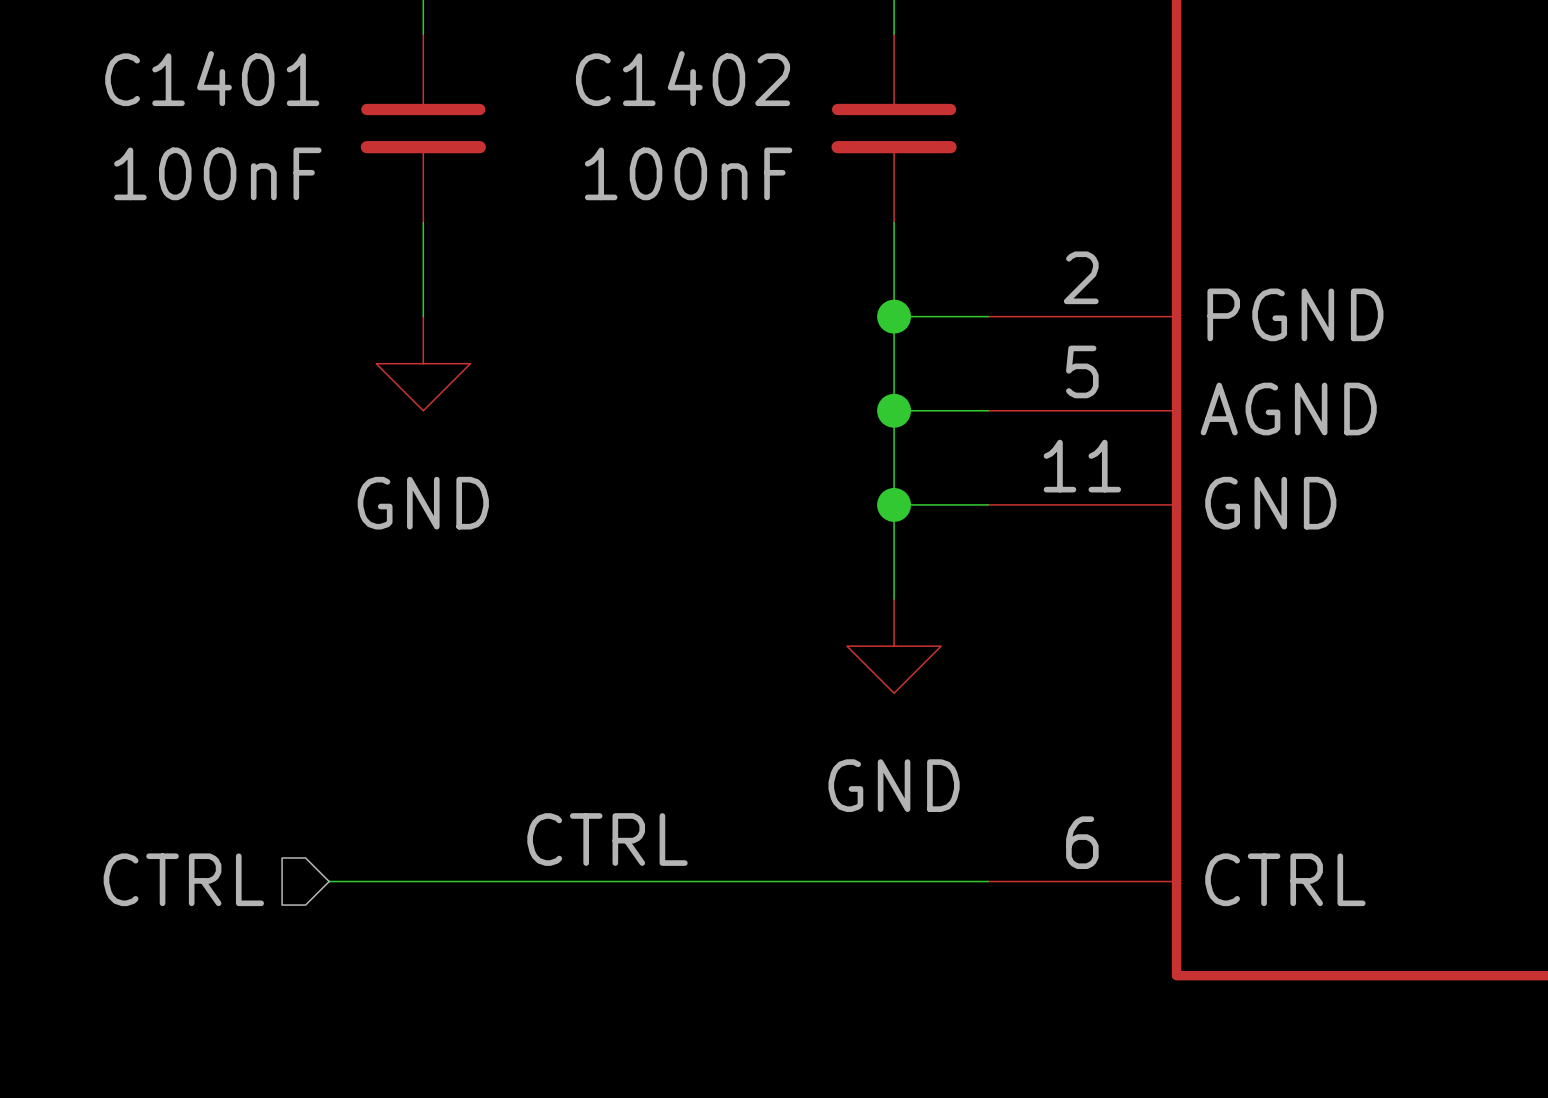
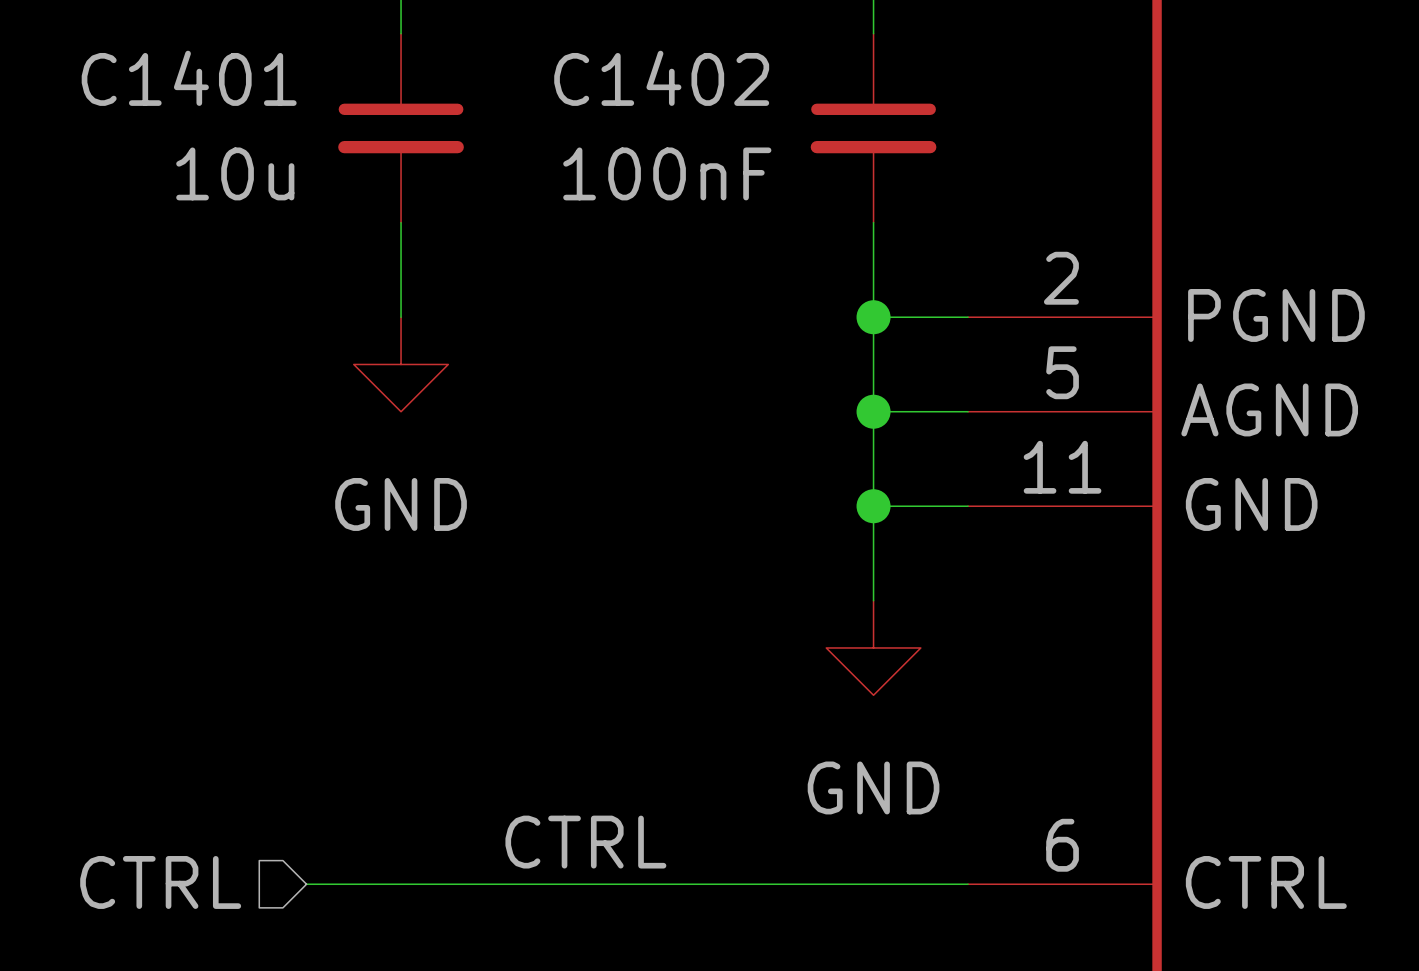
C1401 value: 100nF (217, 173) -> 10u (235, 173)

